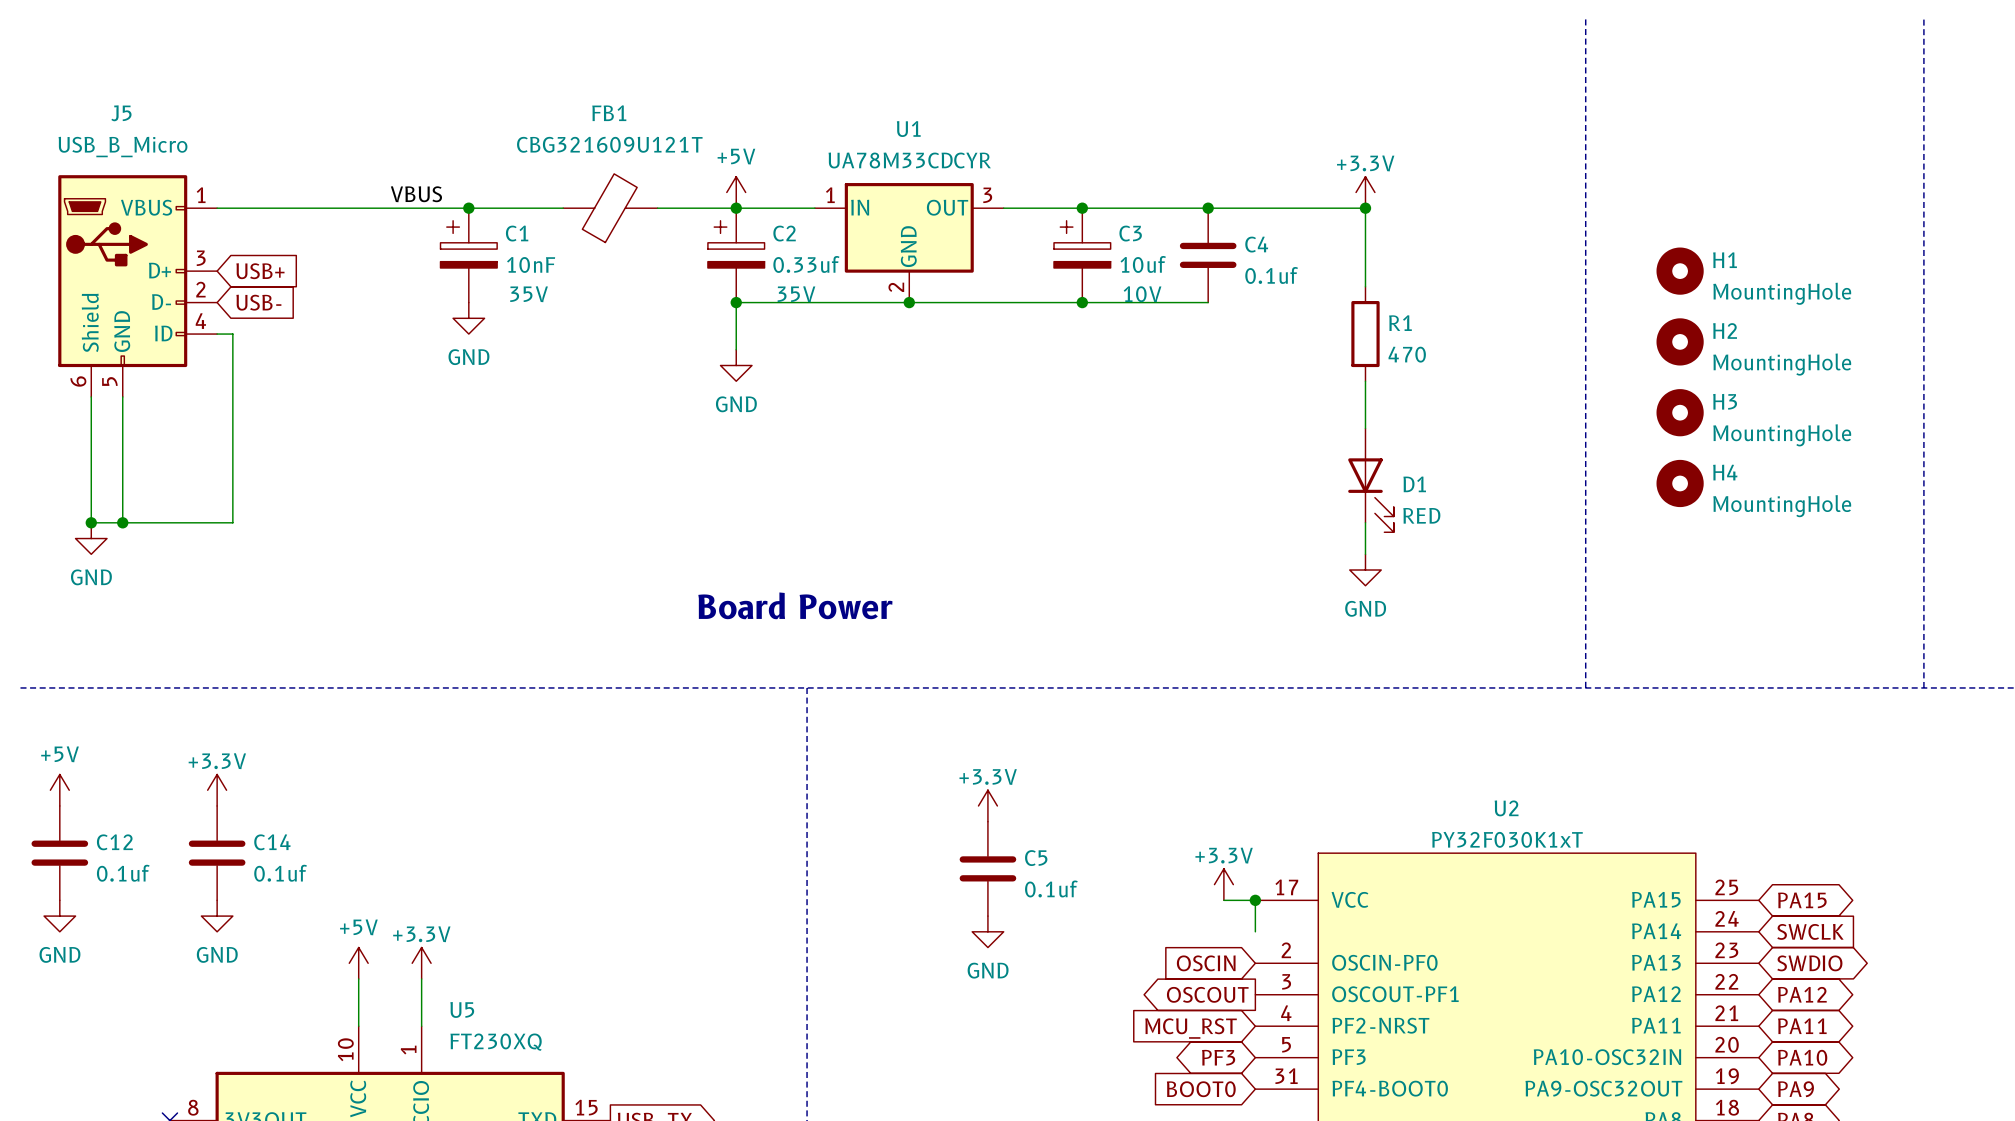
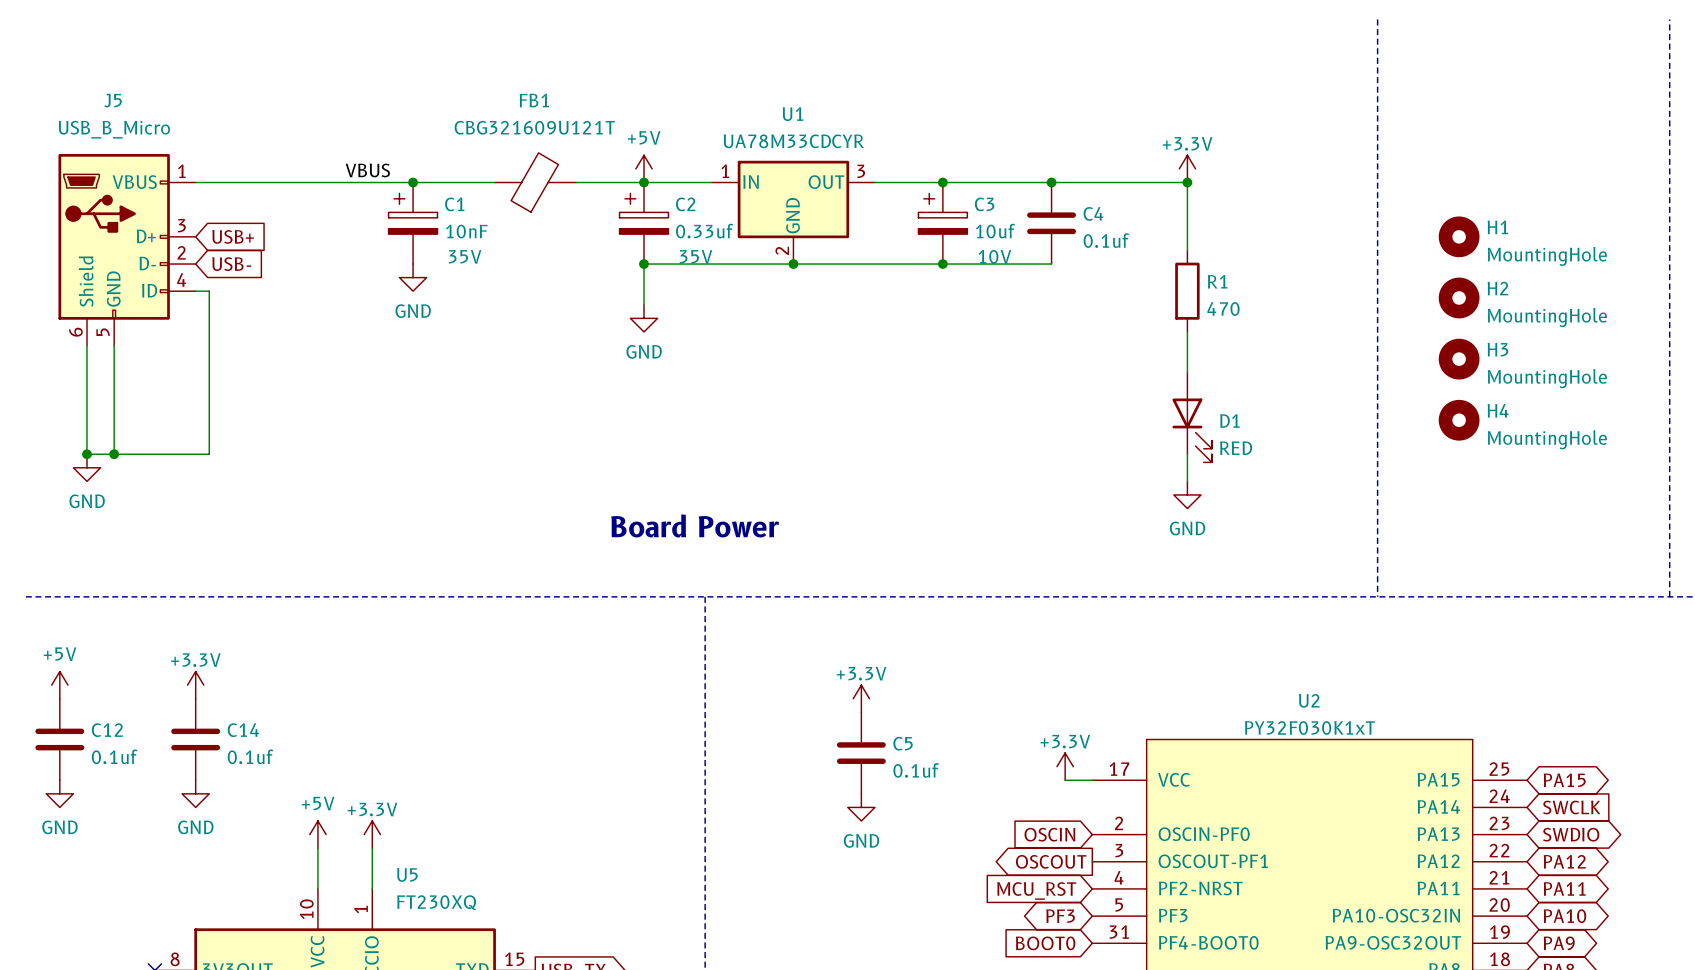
wire: (1255, 900) (1255, 931) -> none
junction: (1255, 900) -> none

